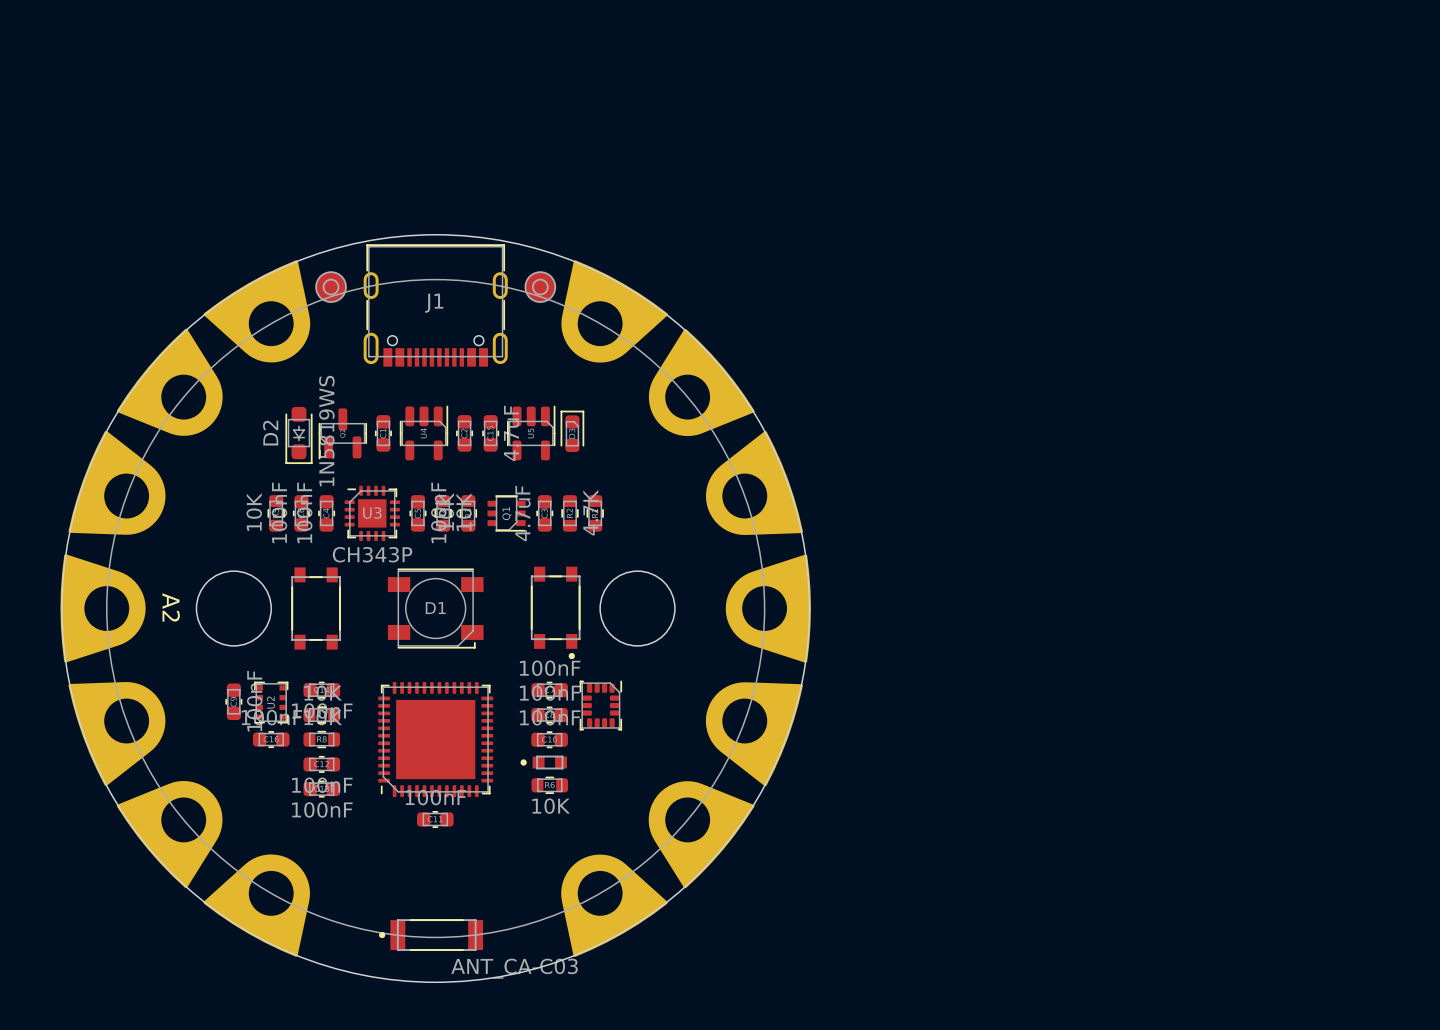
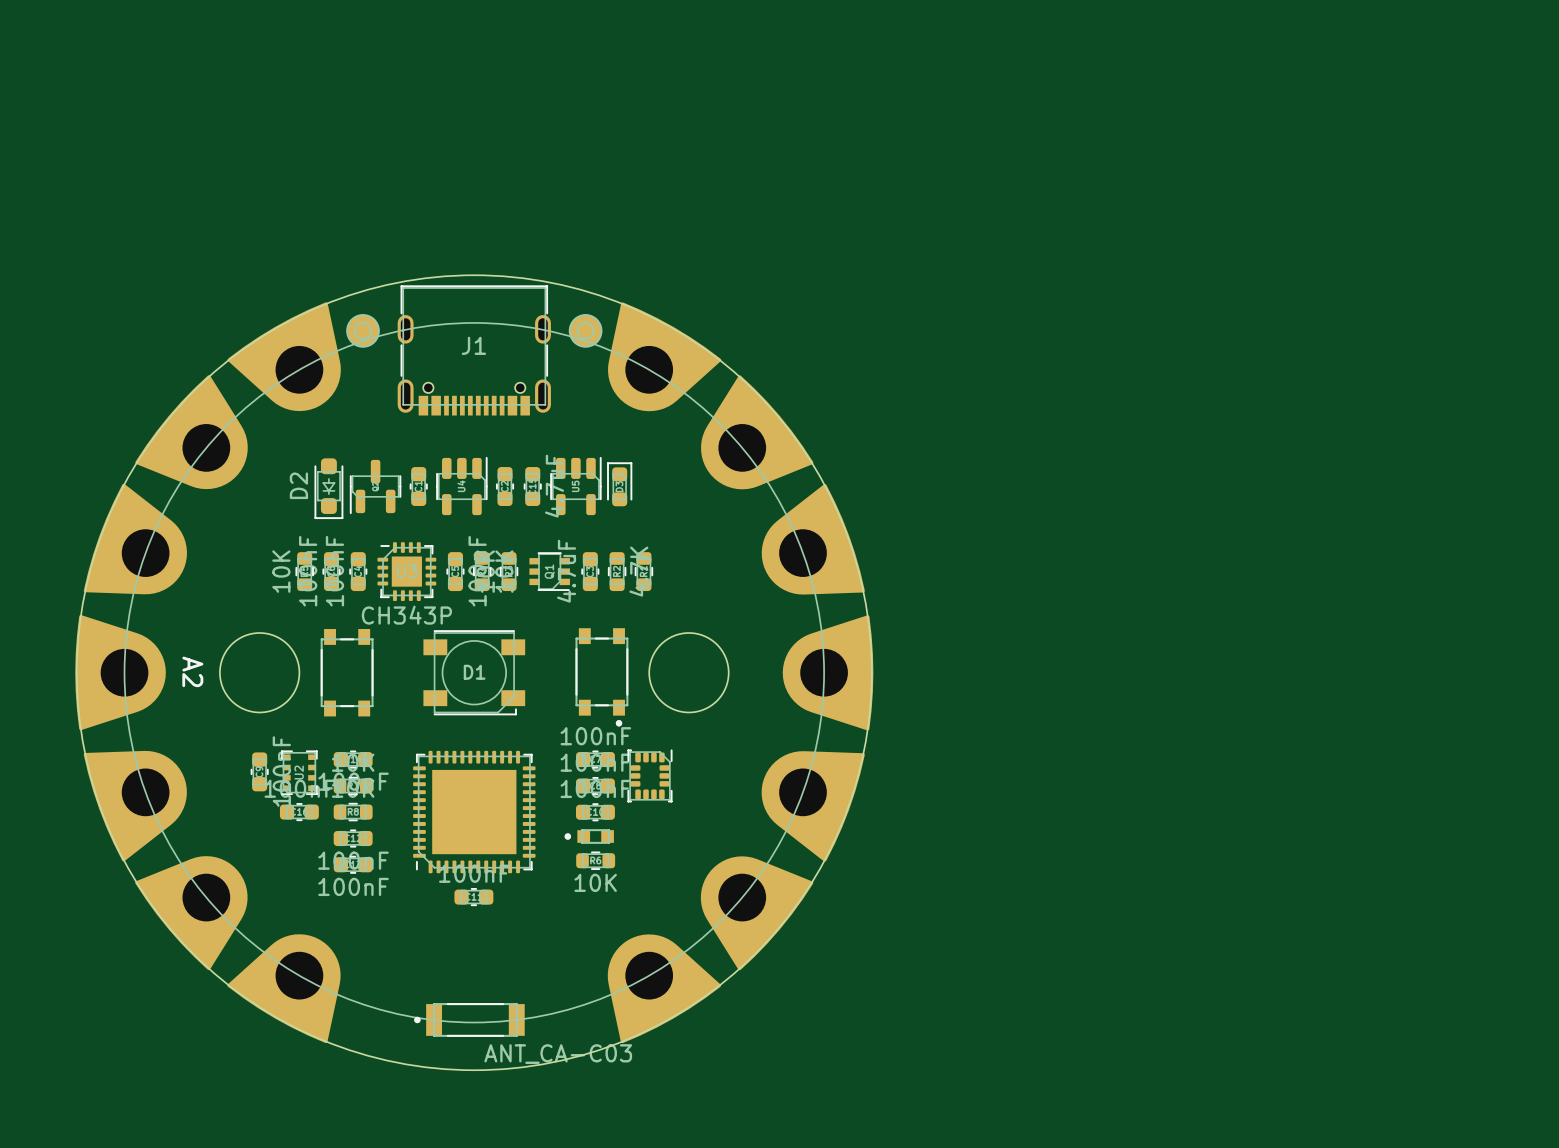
D2 value: 1N5819WS (326, 431) -> none

